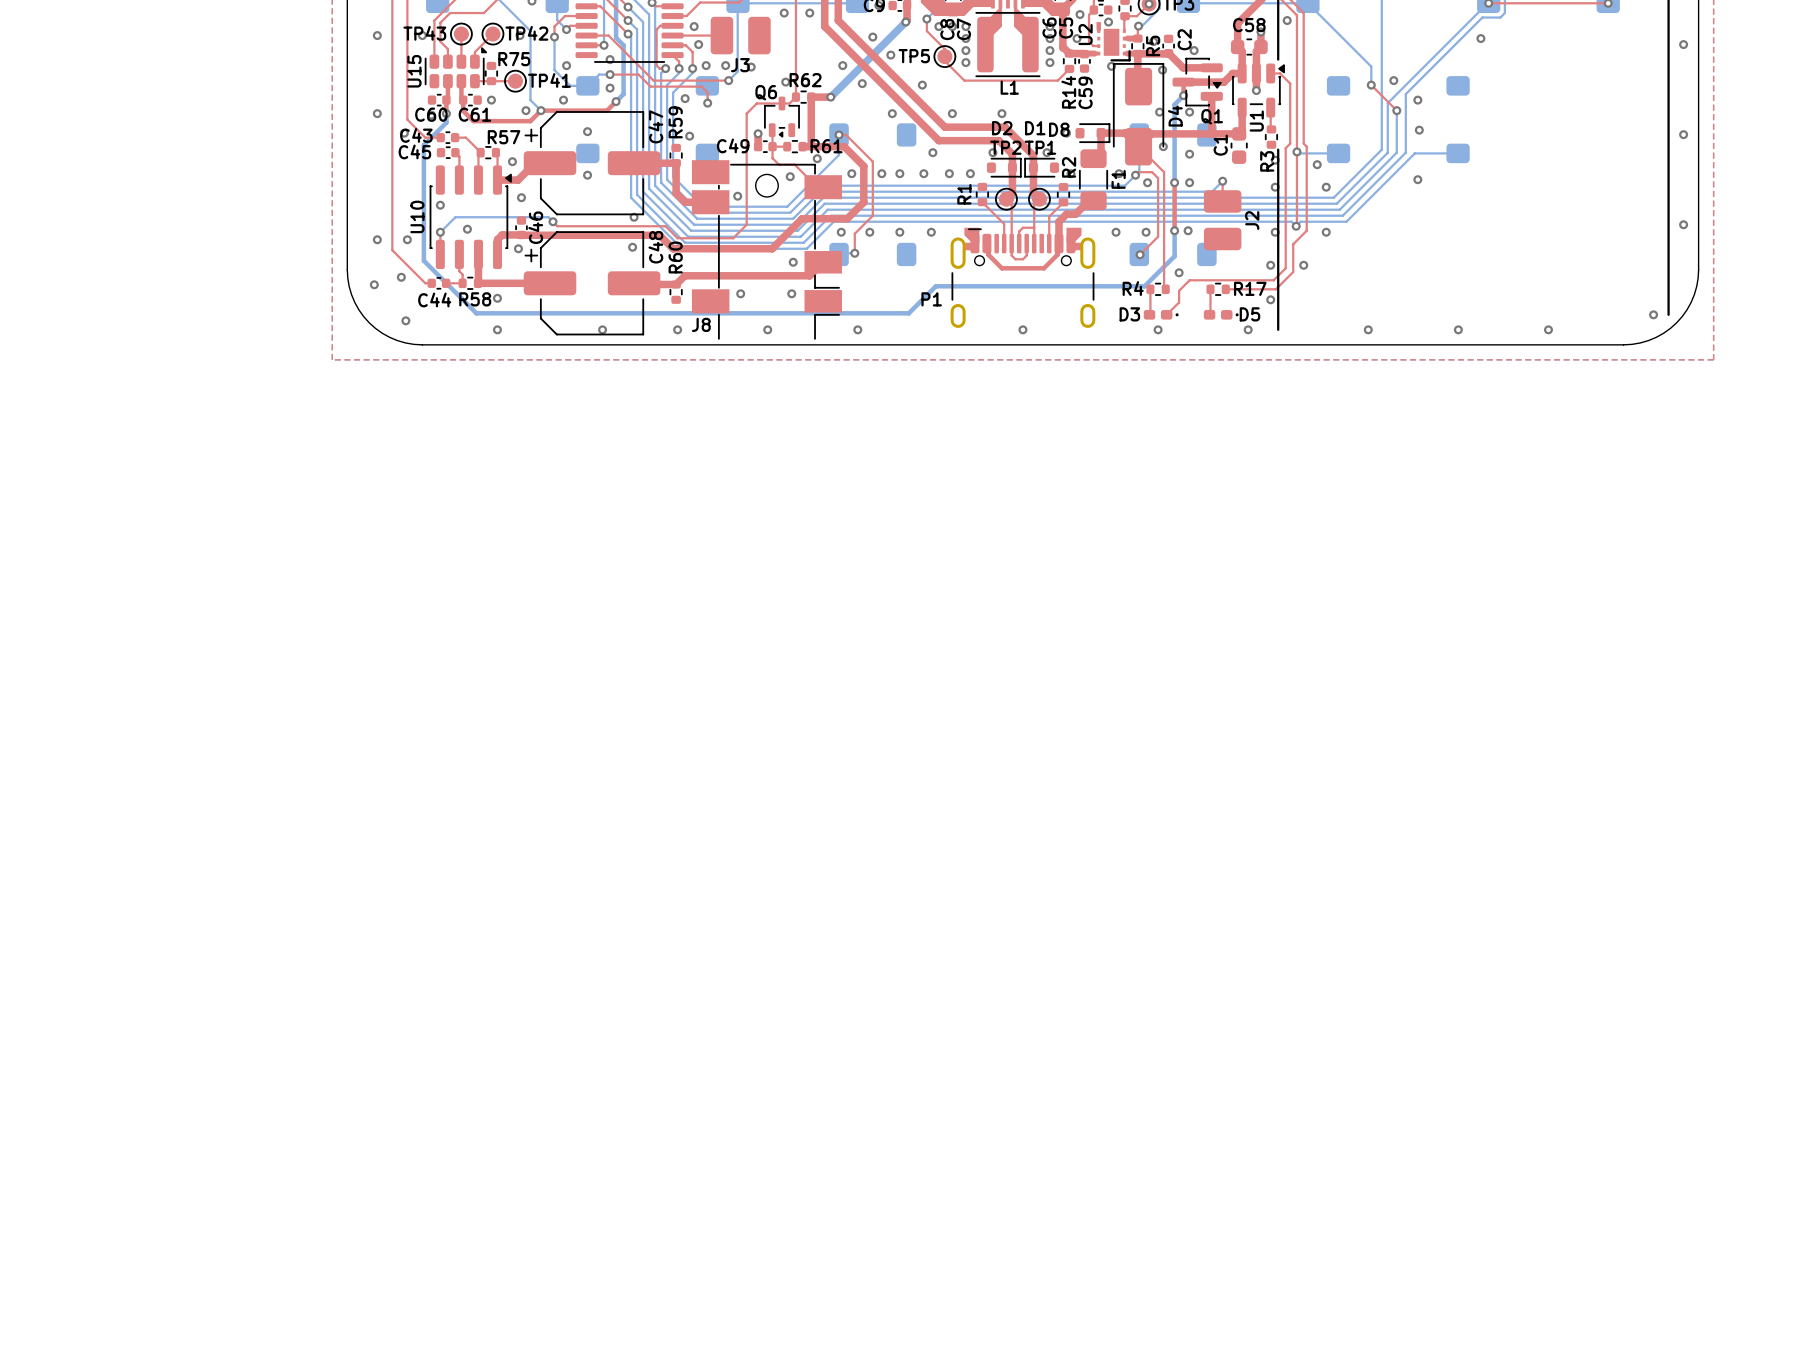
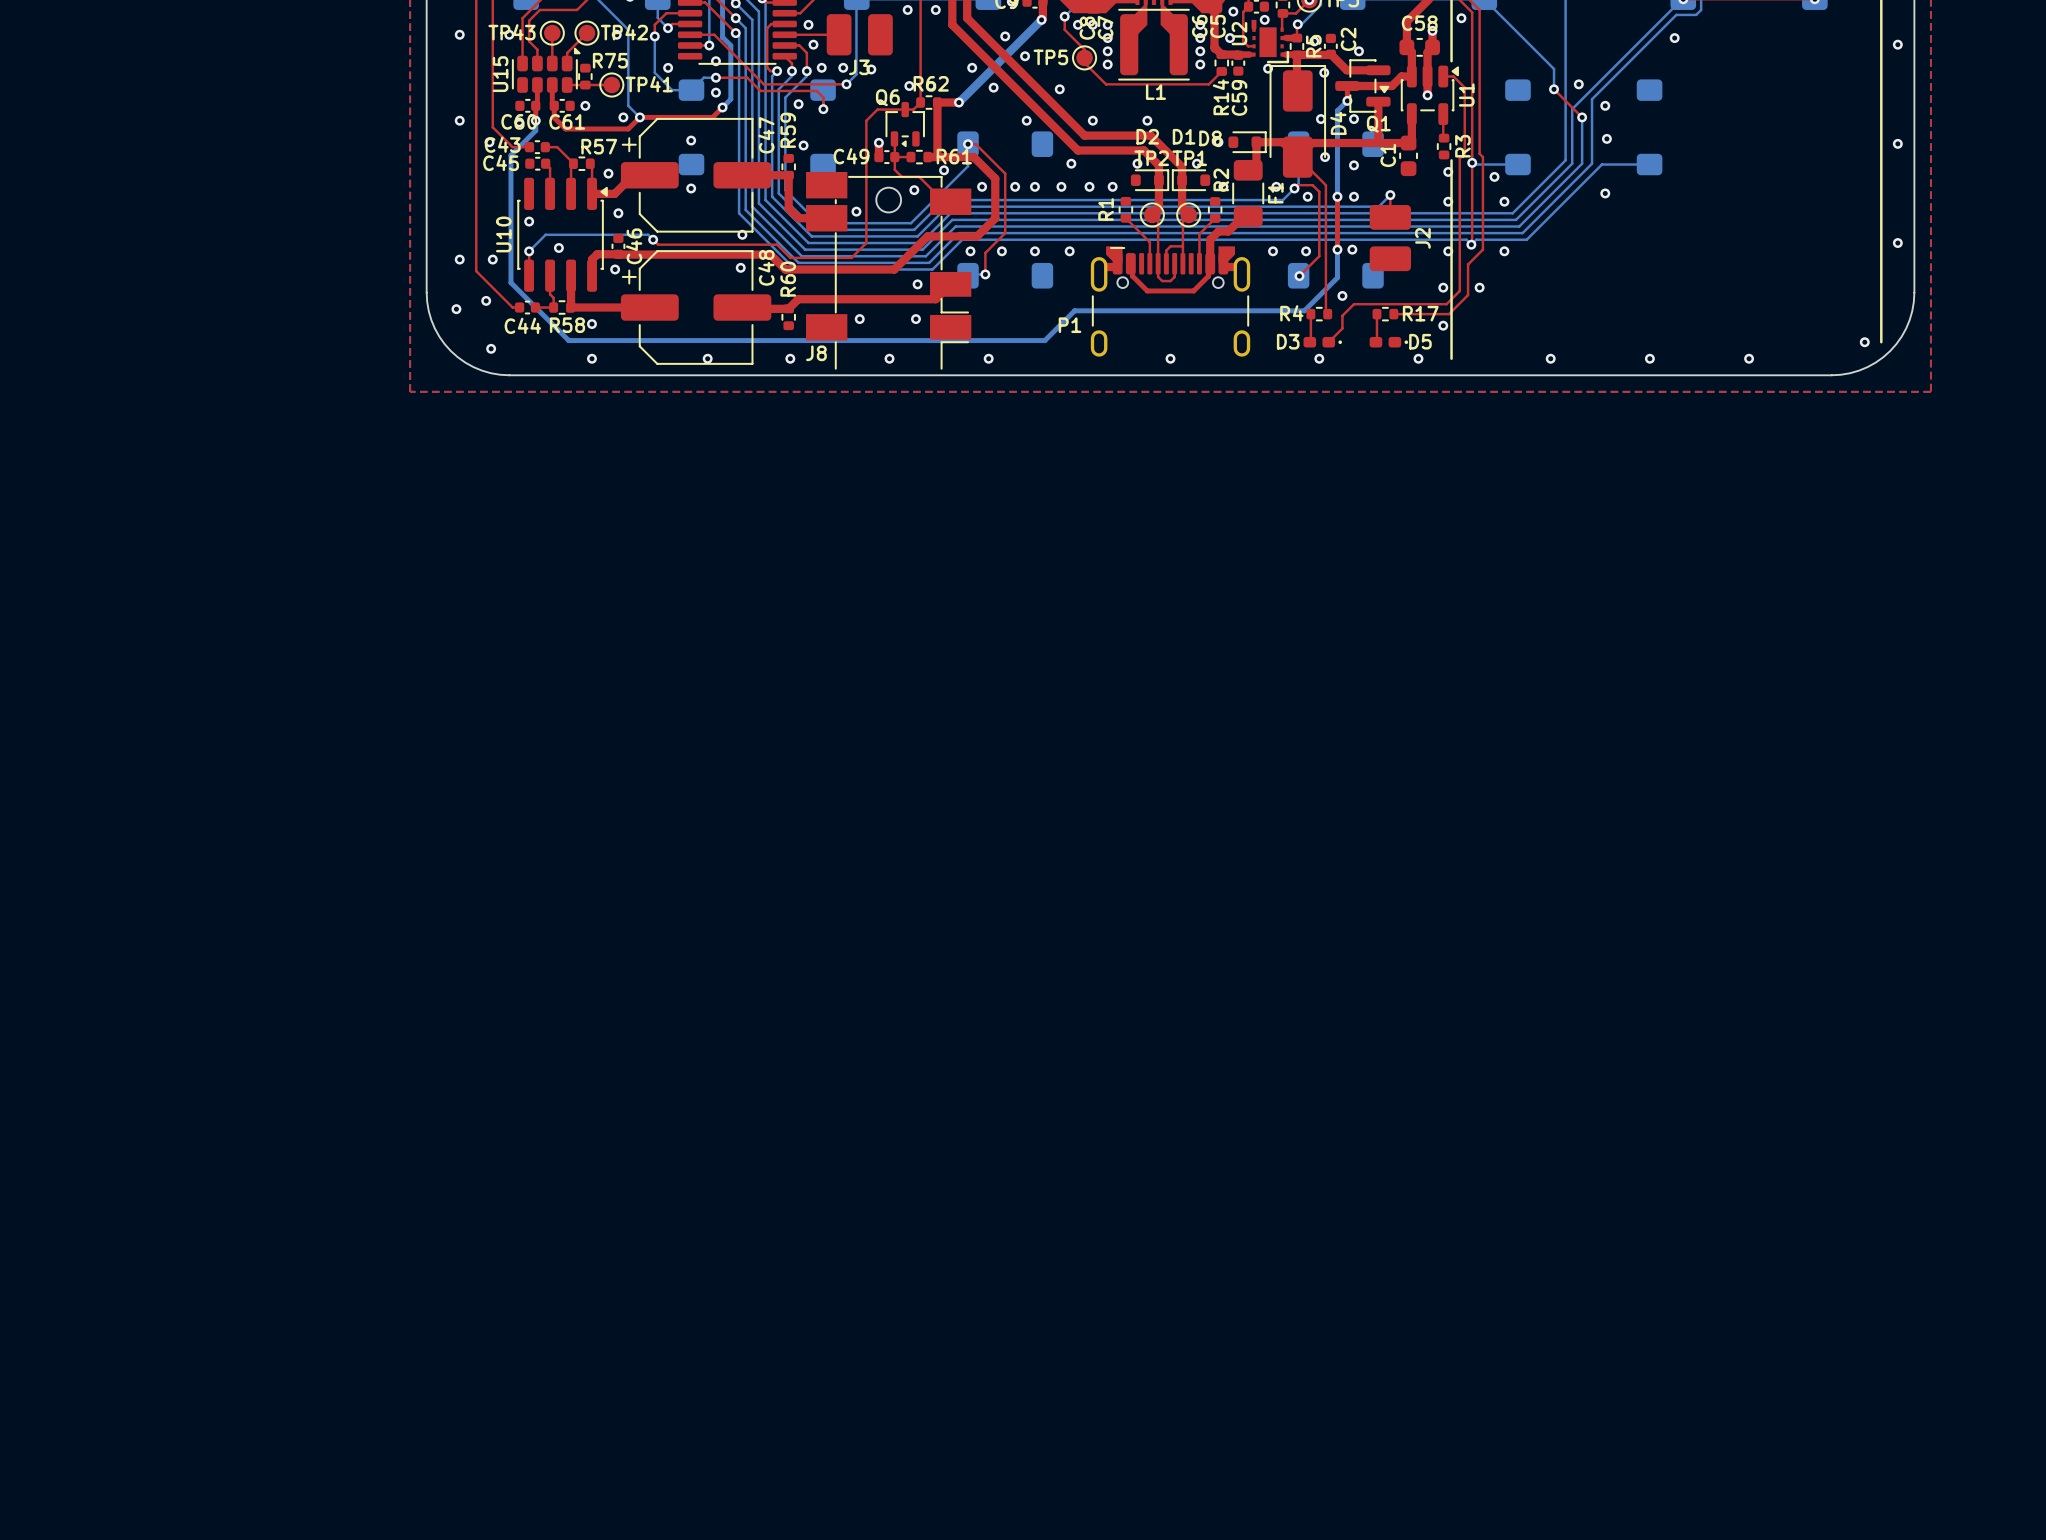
via: (563, 100) -> none
U1 name position: U1 (1256, 121) -> U1 (1466, 94)
R3 name position: R3 (1267, 161) -> R3 (1462, 146)

